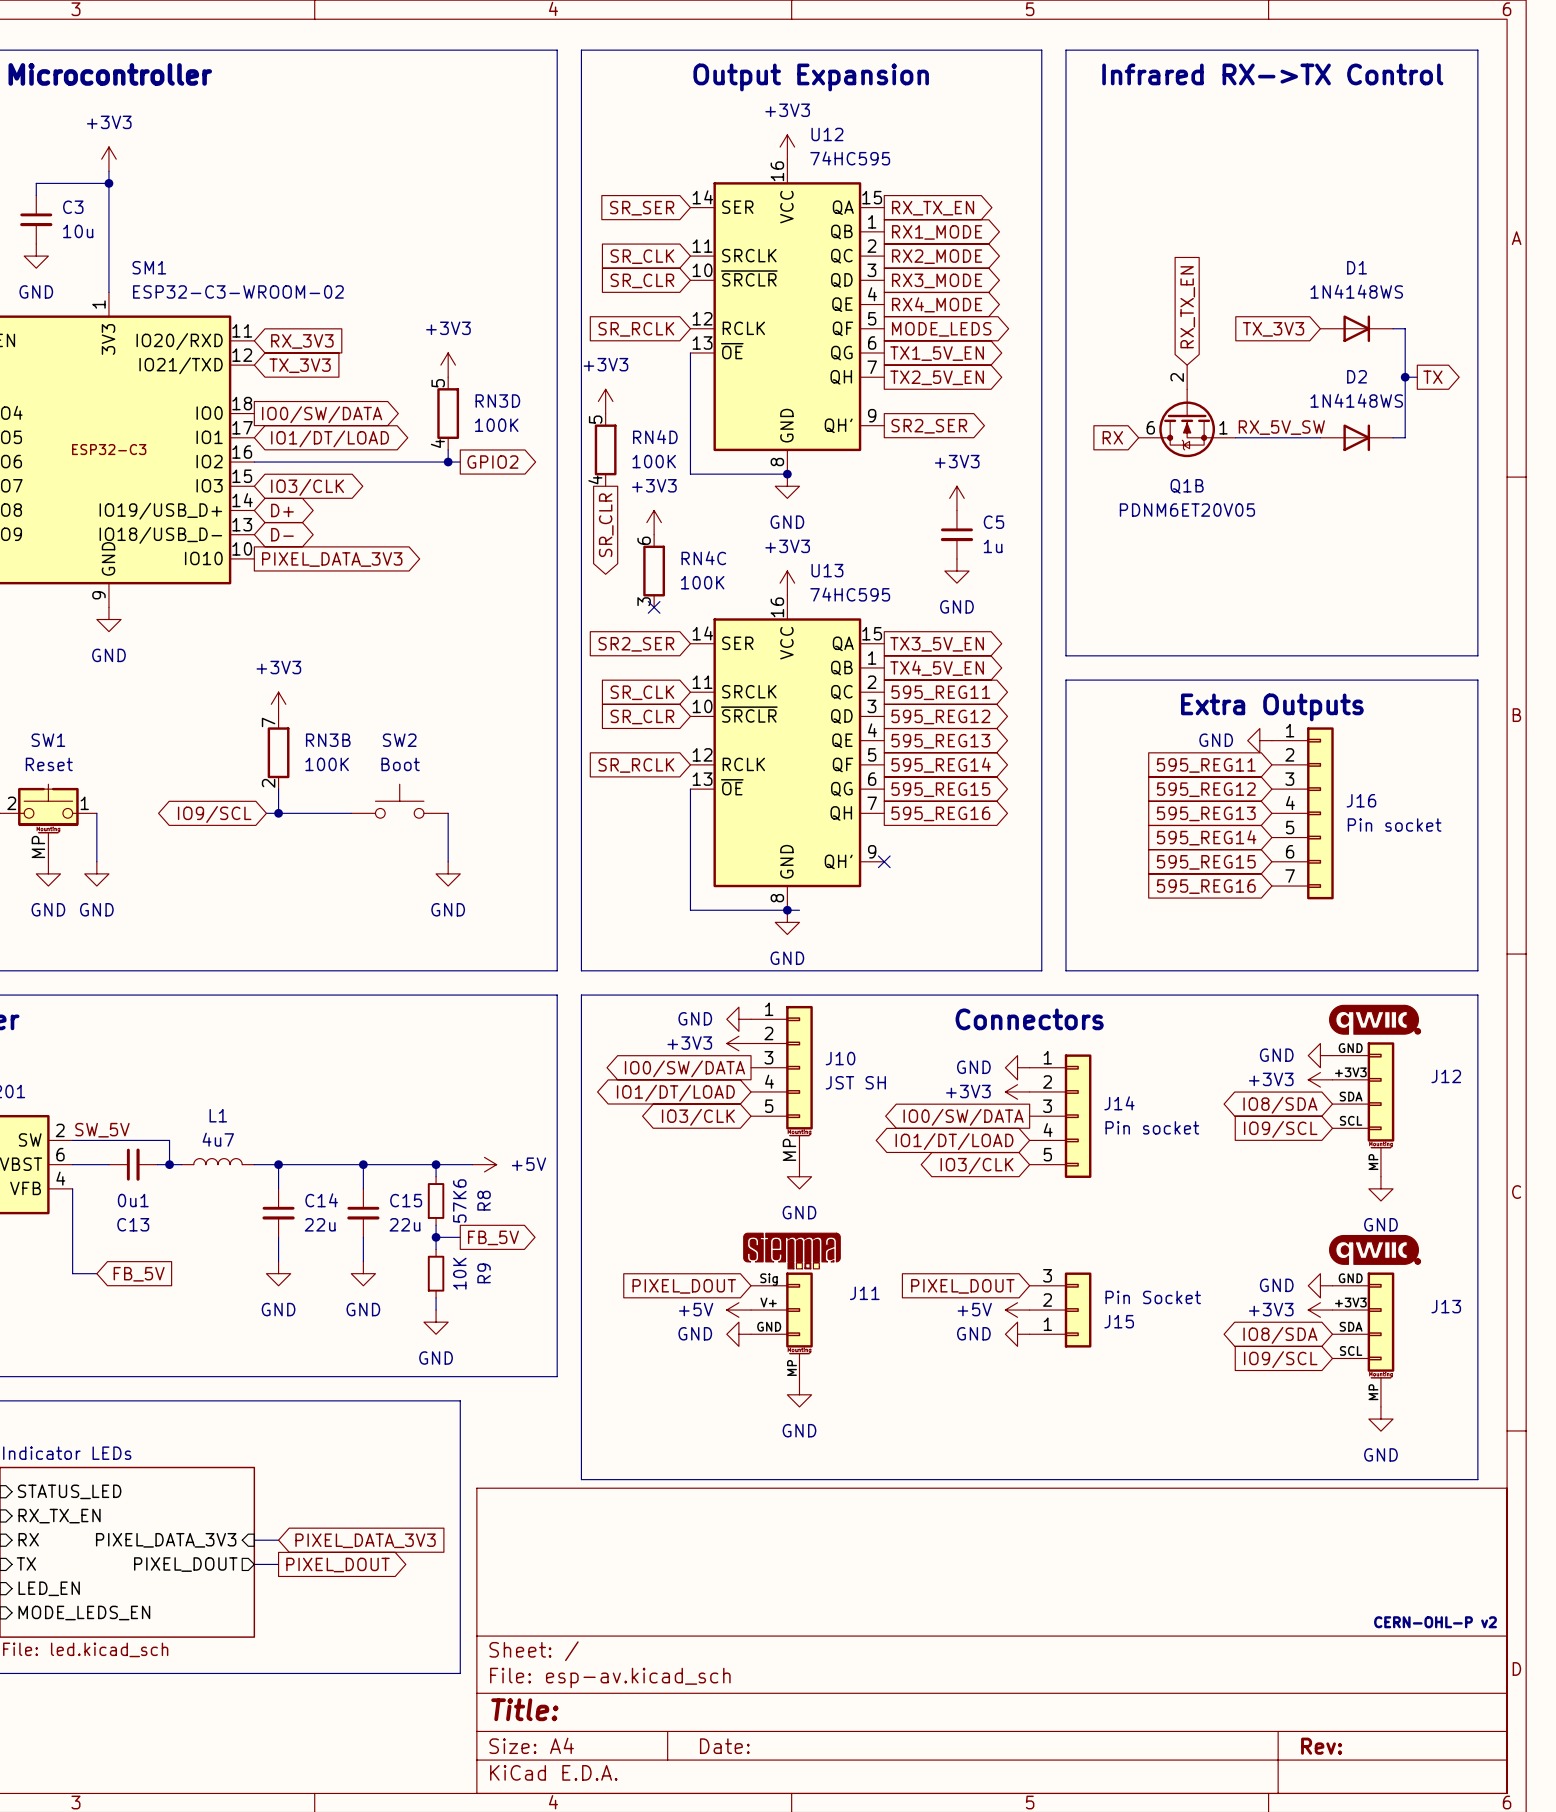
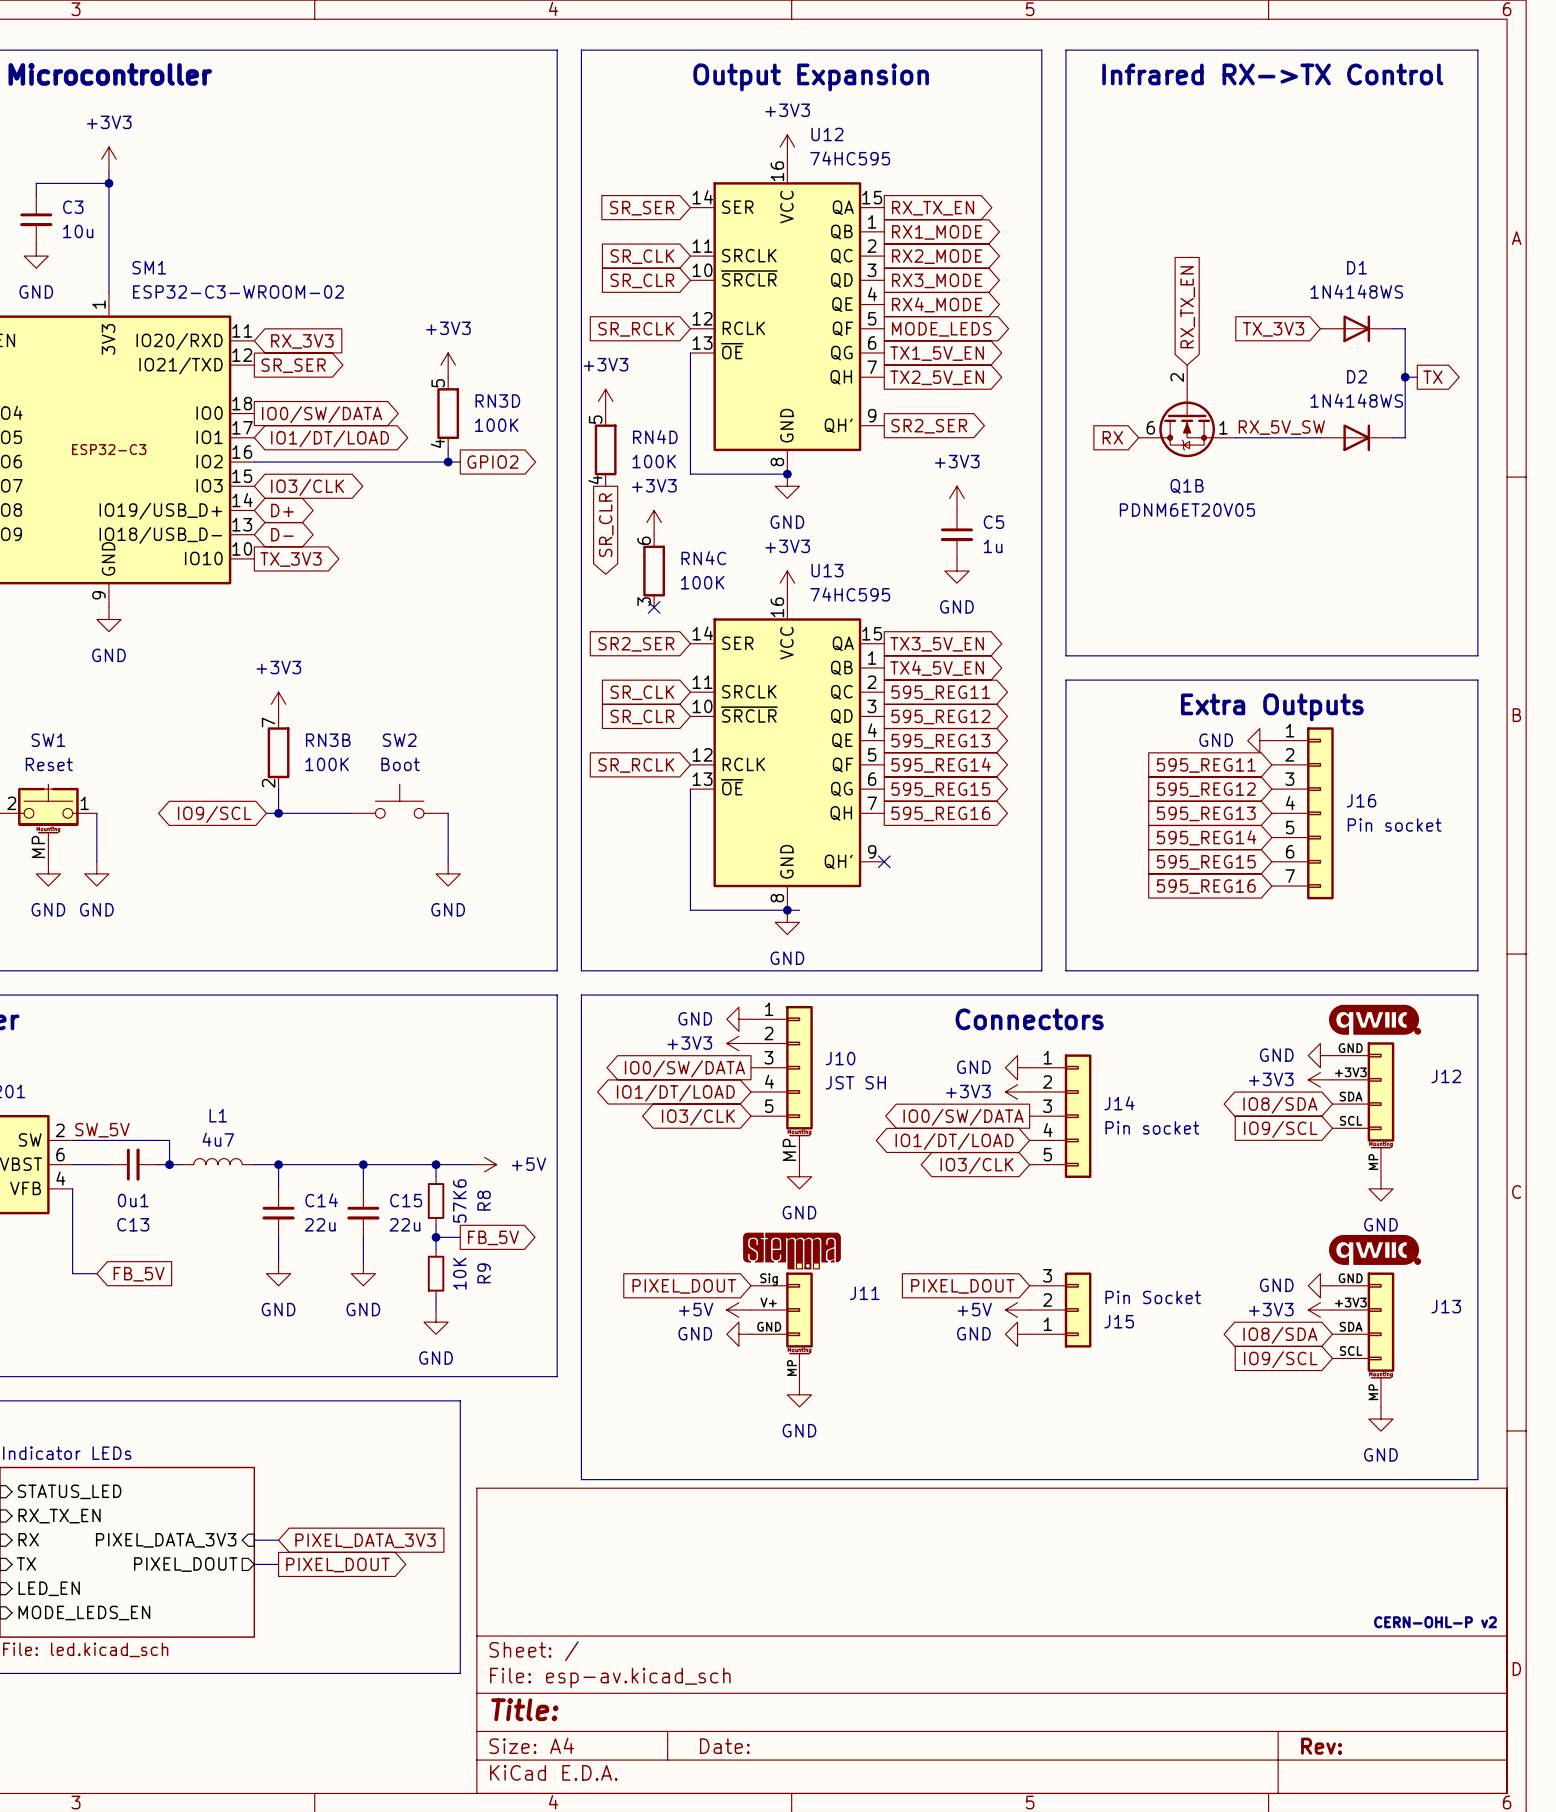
global label shape: input (300, 365) -> output (293, 365)
global label: TX_3V3 (300, 365) -> SR_SER (293, 365)
global label: PIXEL_DATA_3V3 (332, 559) -> TX_3V3 (290, 559)

